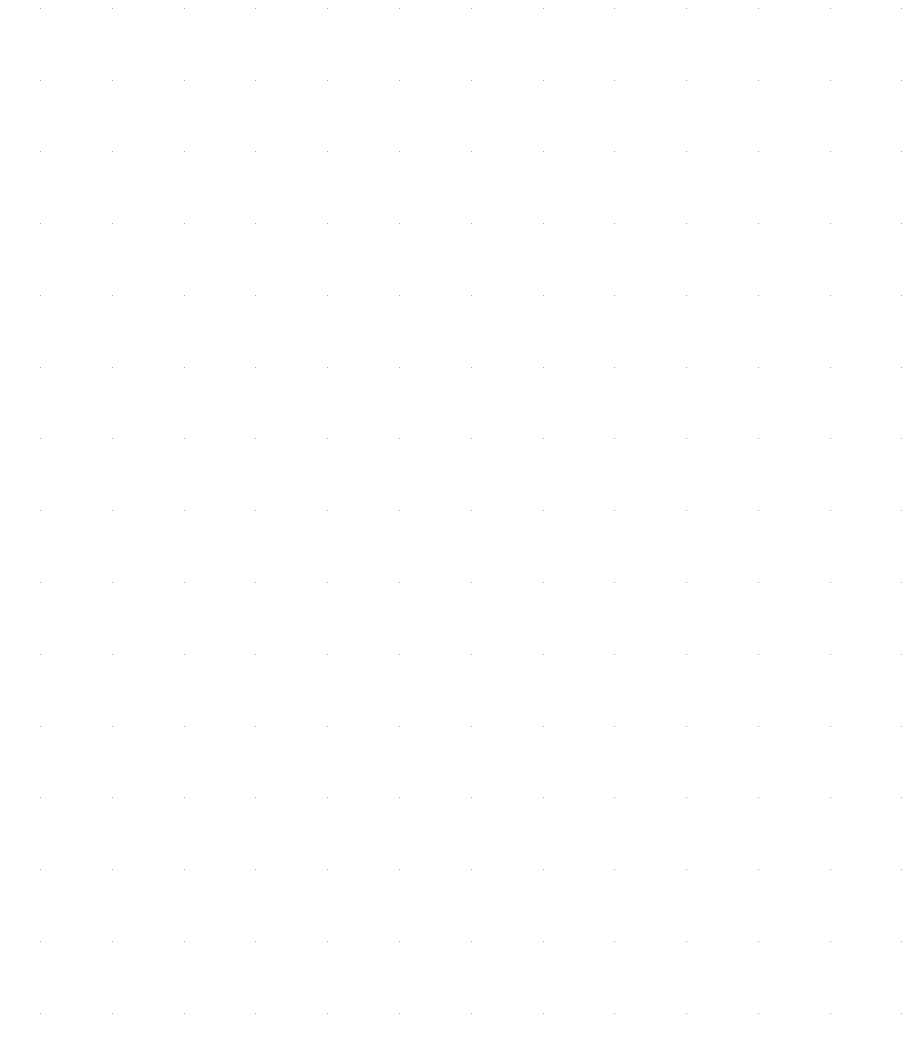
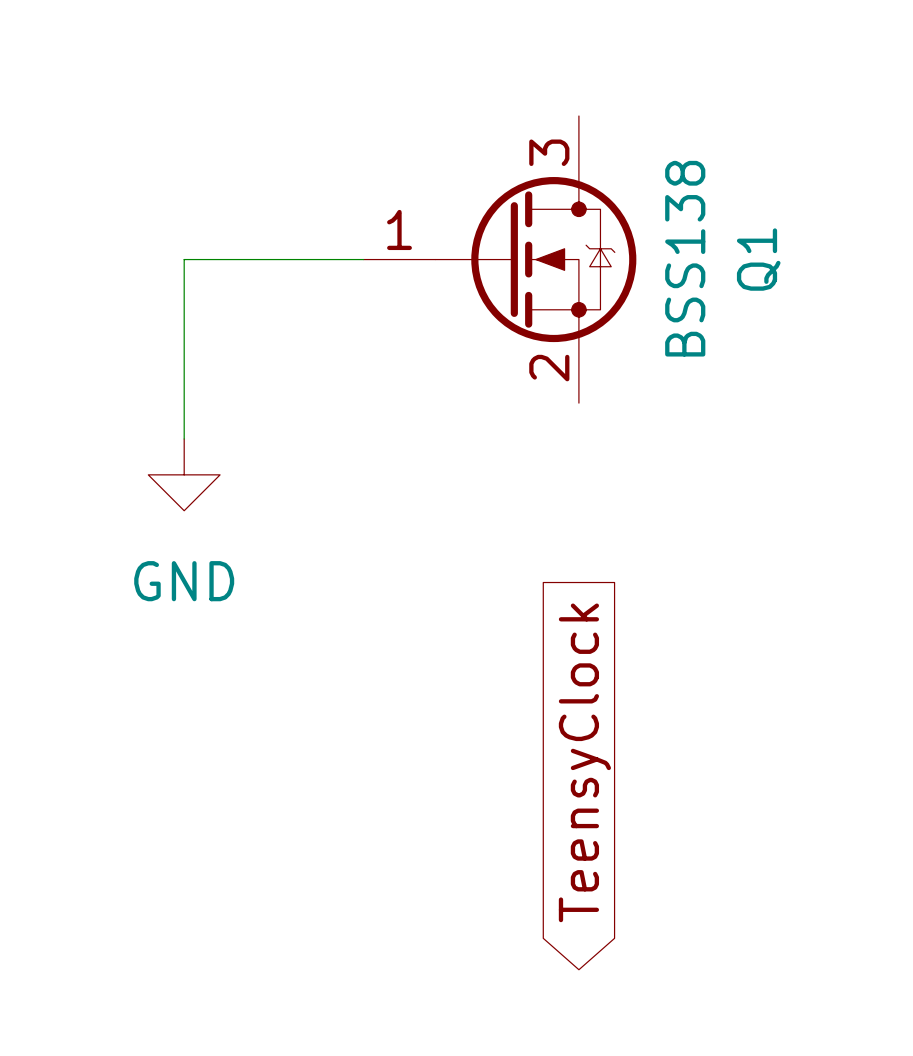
wire: none -> (363, 259) (184, 259) (184, 438)
Q1: none -> BSS138 (499, 259)
power symbol: none -> GND (184, 474)
global label: none -> TeensyClock (584, 762)

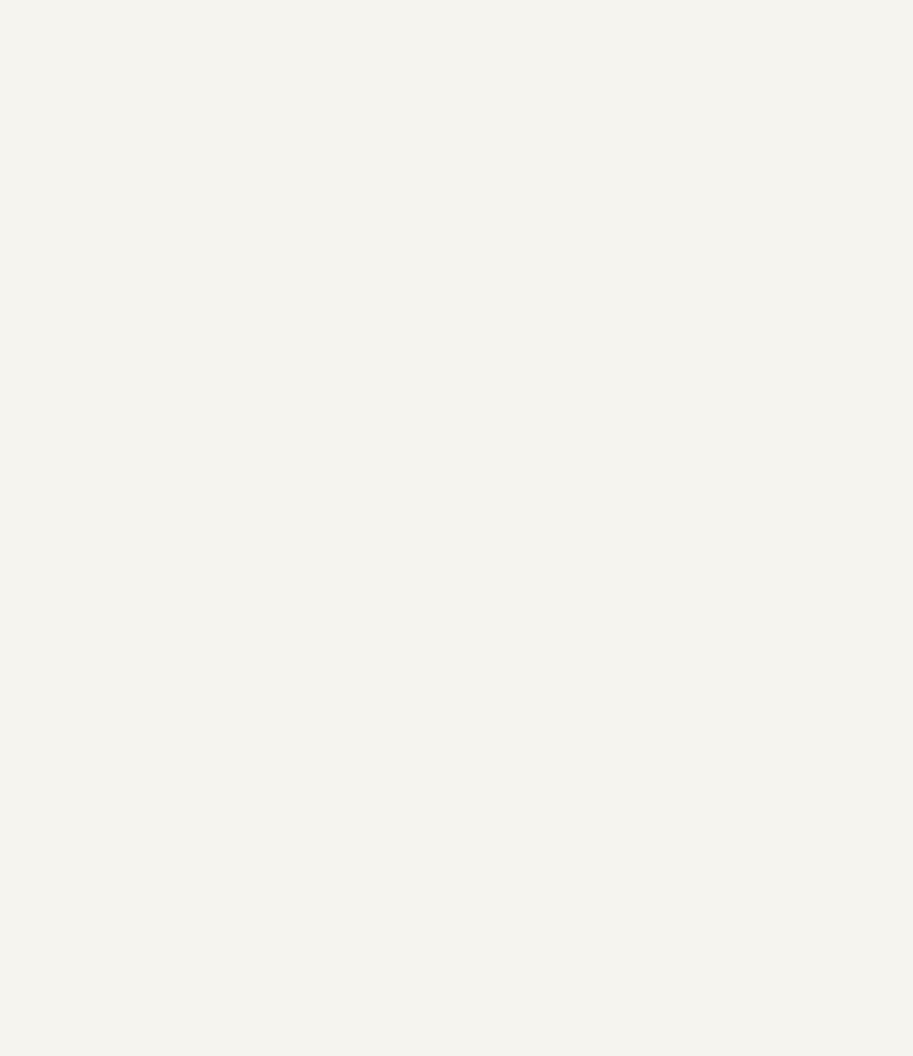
wire: (363, 259) (184, 259) (184, 438) -> none
Q1: BSS138 (499, 259) -> none
power symbol: GND (184, 474) -> none
global label: TeensyClock (584, 762) -> none

